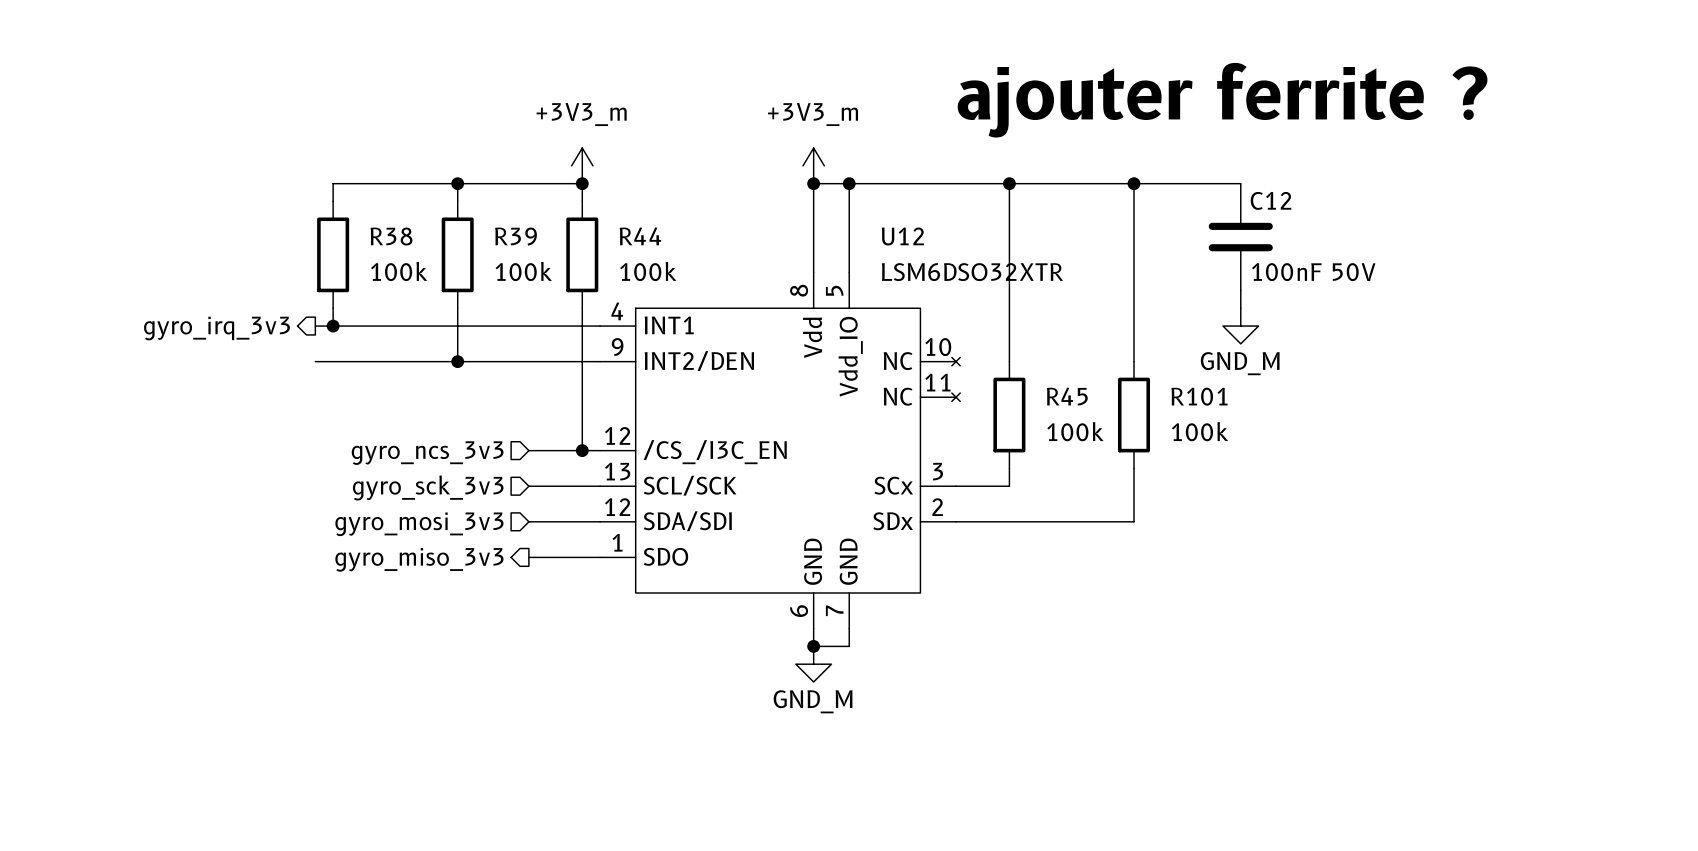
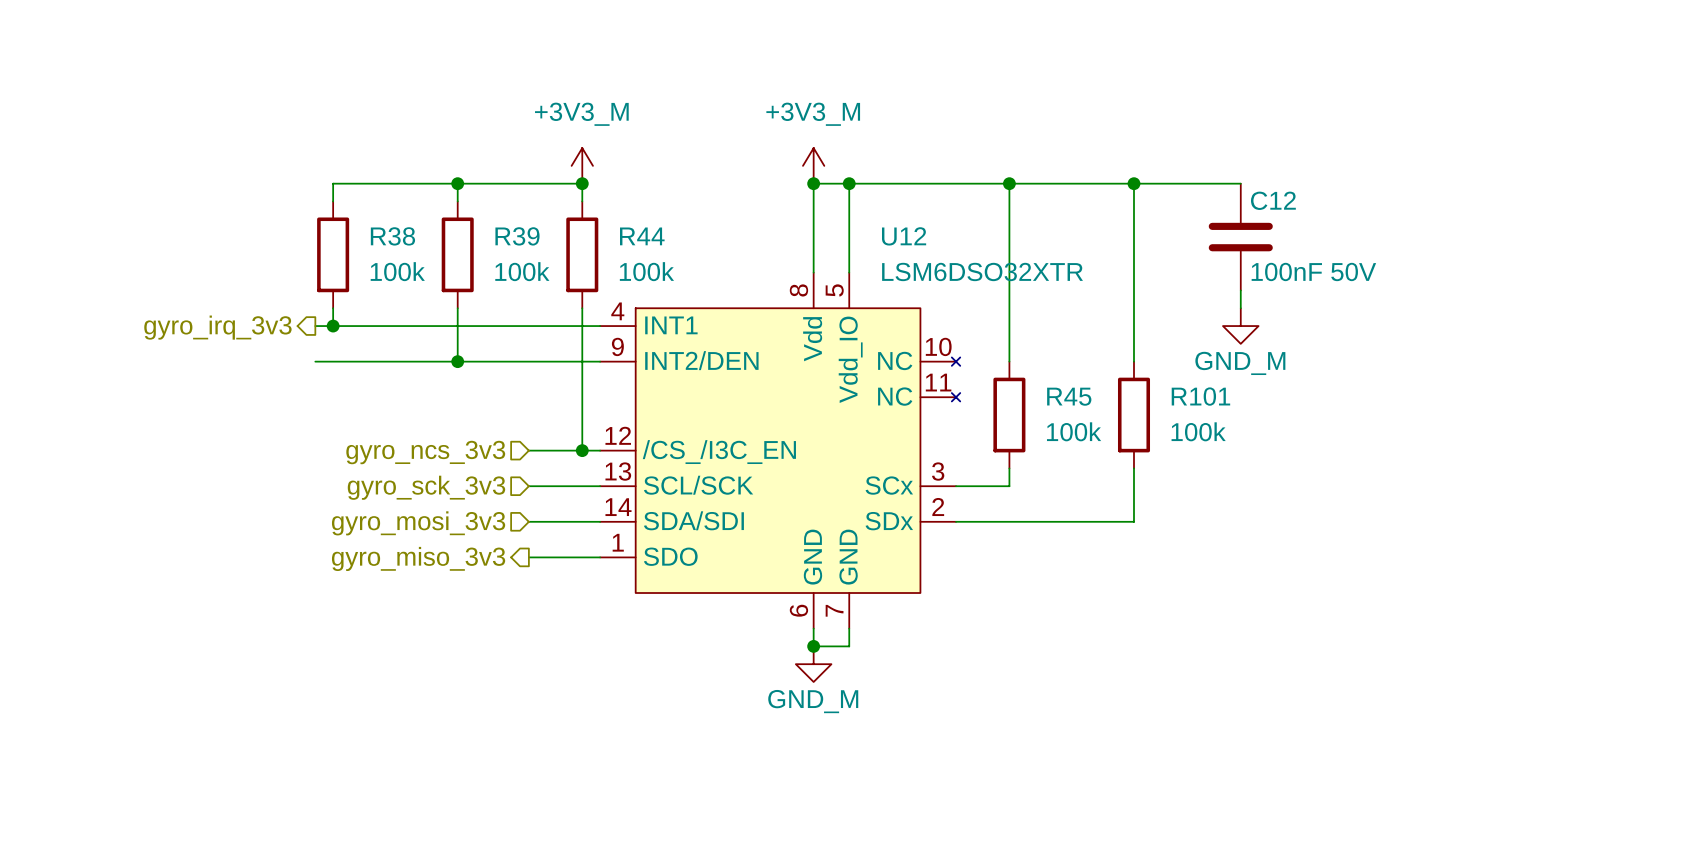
text: ajouter ferrite ? (1222, 100) -> none
power symbol: +3V3_m (582, 165) -> +3V3_M (582, 165)
power symbol: +3V3_m (813, 165) -> +3V3_M (813, 165)
U12 pin number: 12 (617, 507) -> 14 (618, 507)

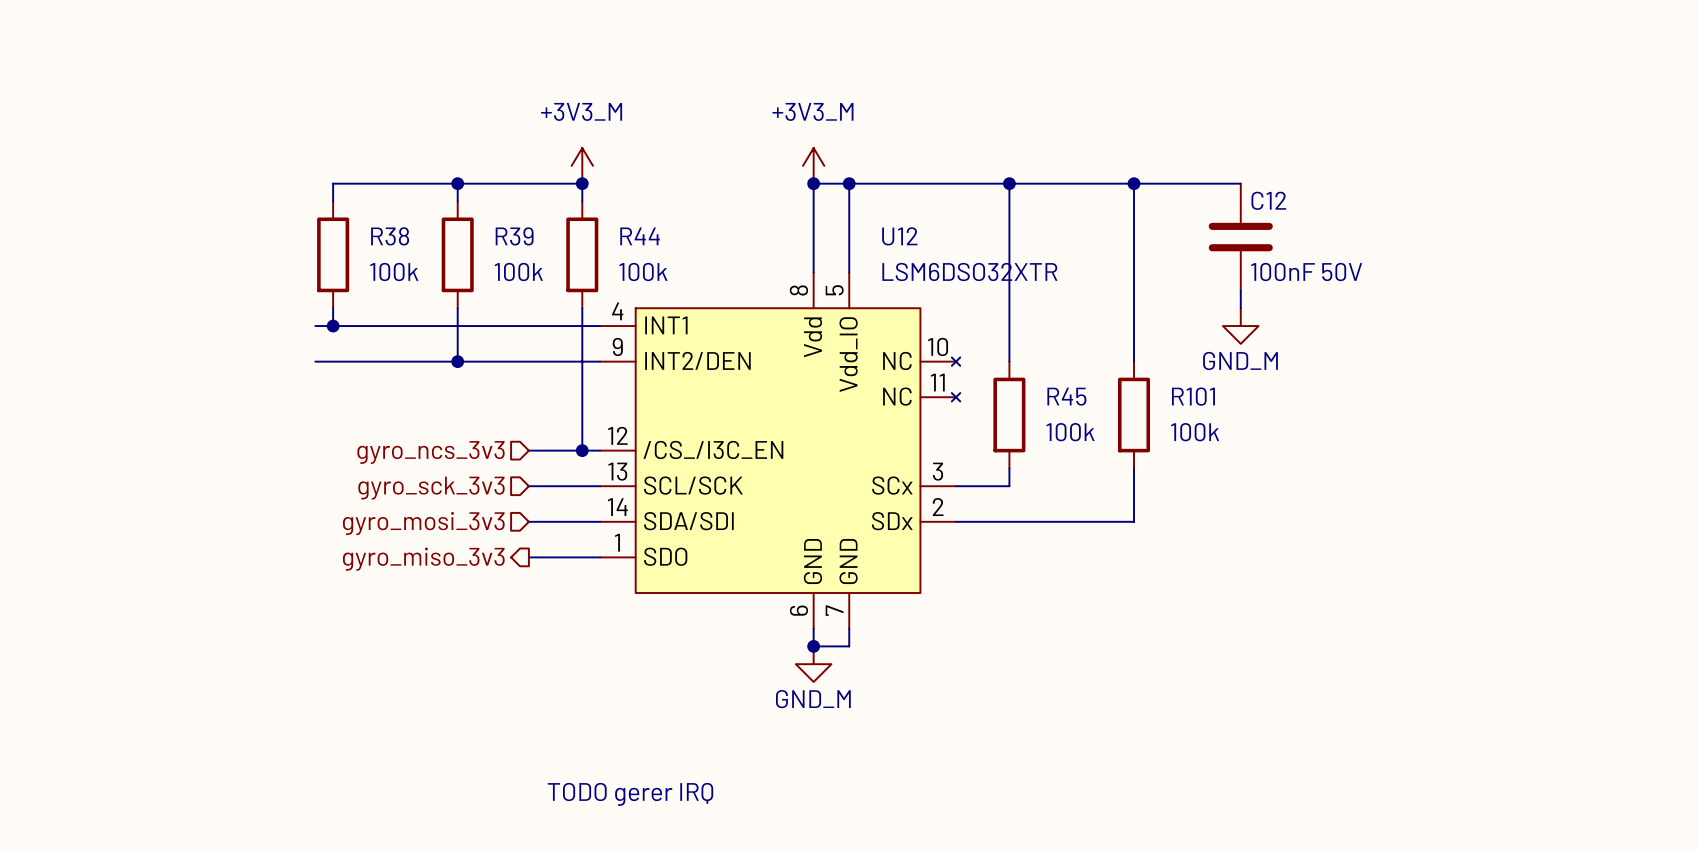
hierarchical label: gyro_irq_3v3 (217, 327) -> none
text: none -> TODO gerer IRQ (630, 794)

